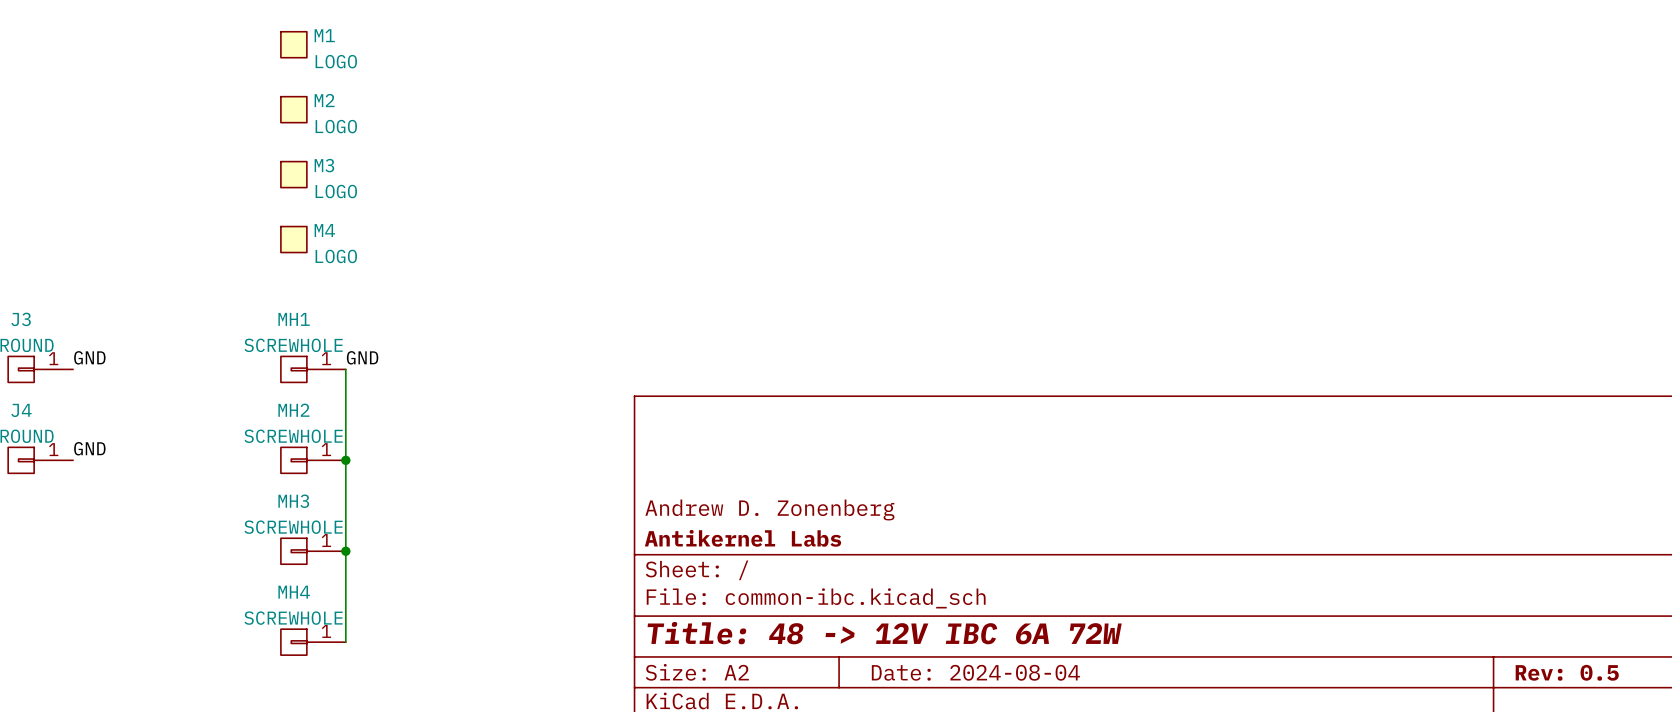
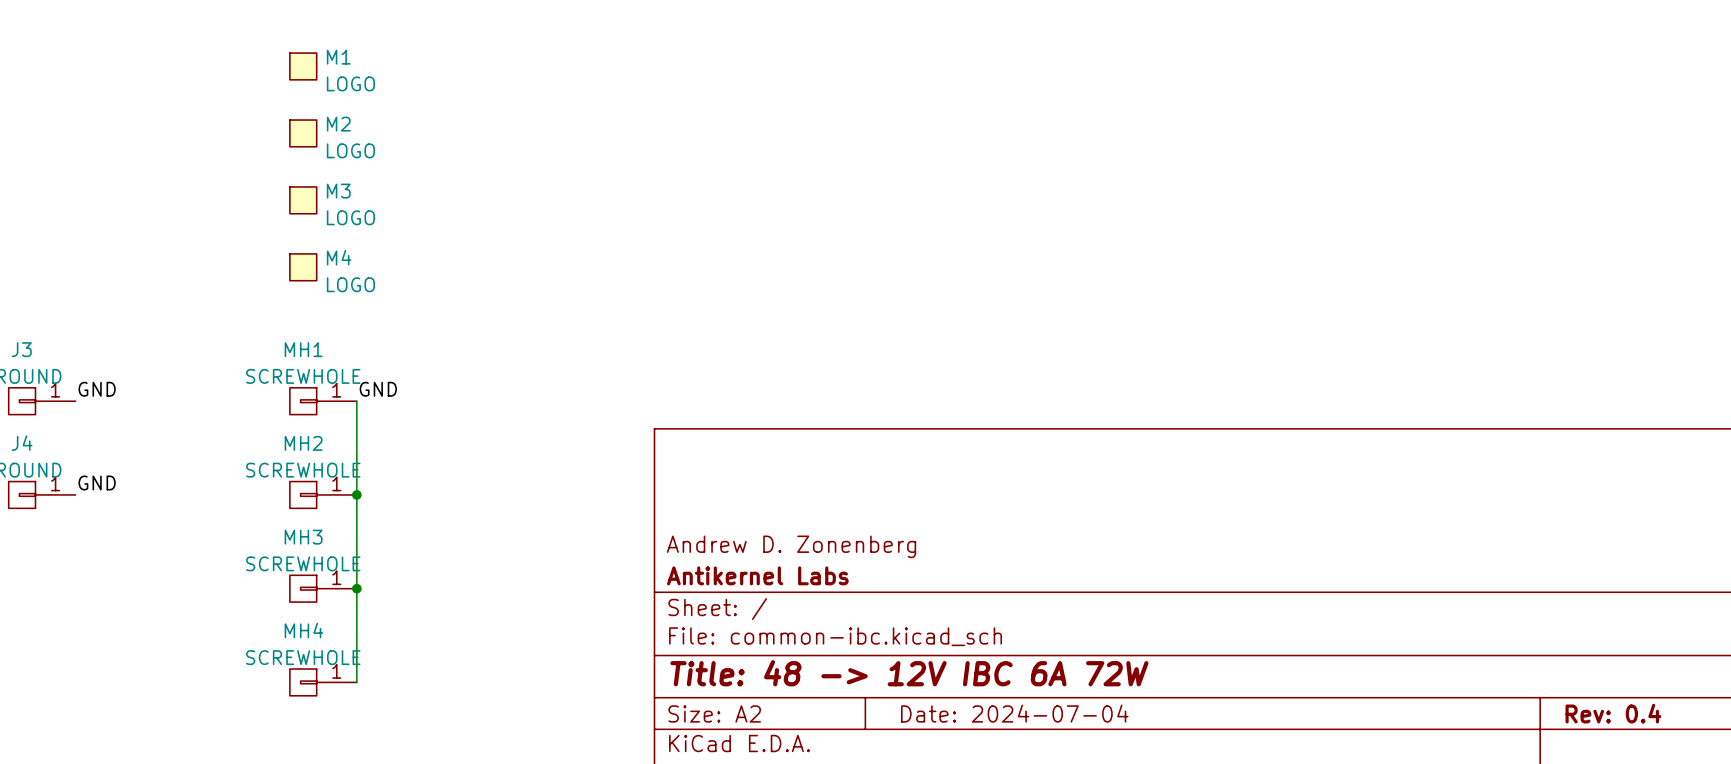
title block: Date: 2024-08-04 (975, 672) -> Date: 2024-07-04 (1014, 713)
title block: Rev: 0.5 (1567, 672) -> Rev: 0.4 (1613, 713)

